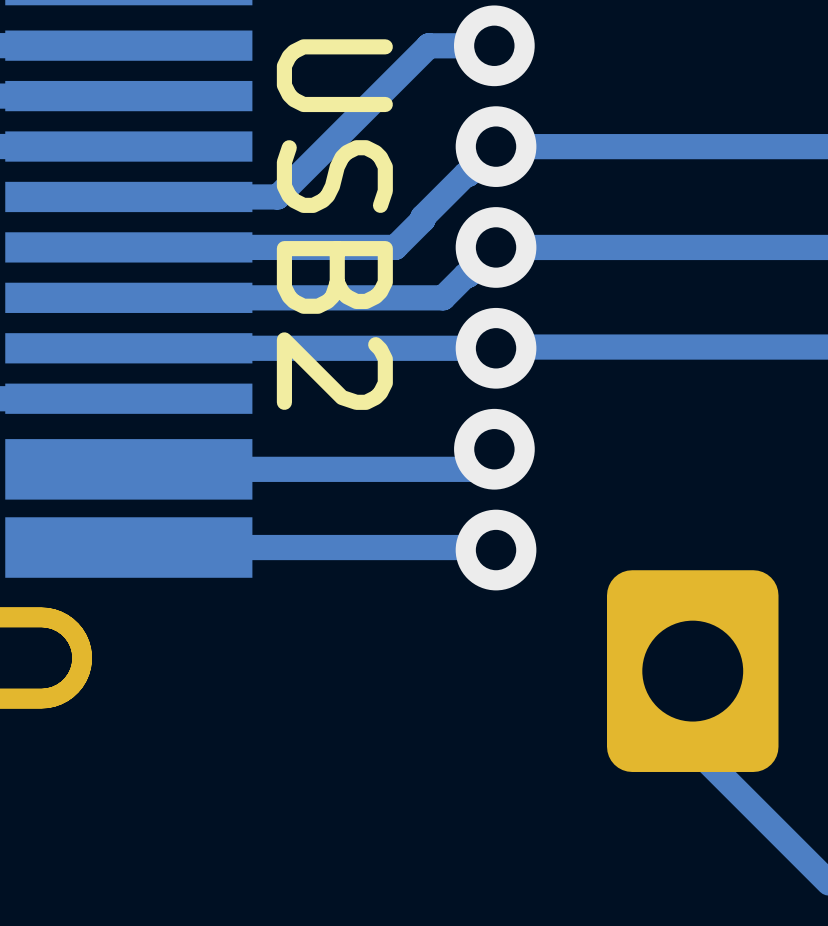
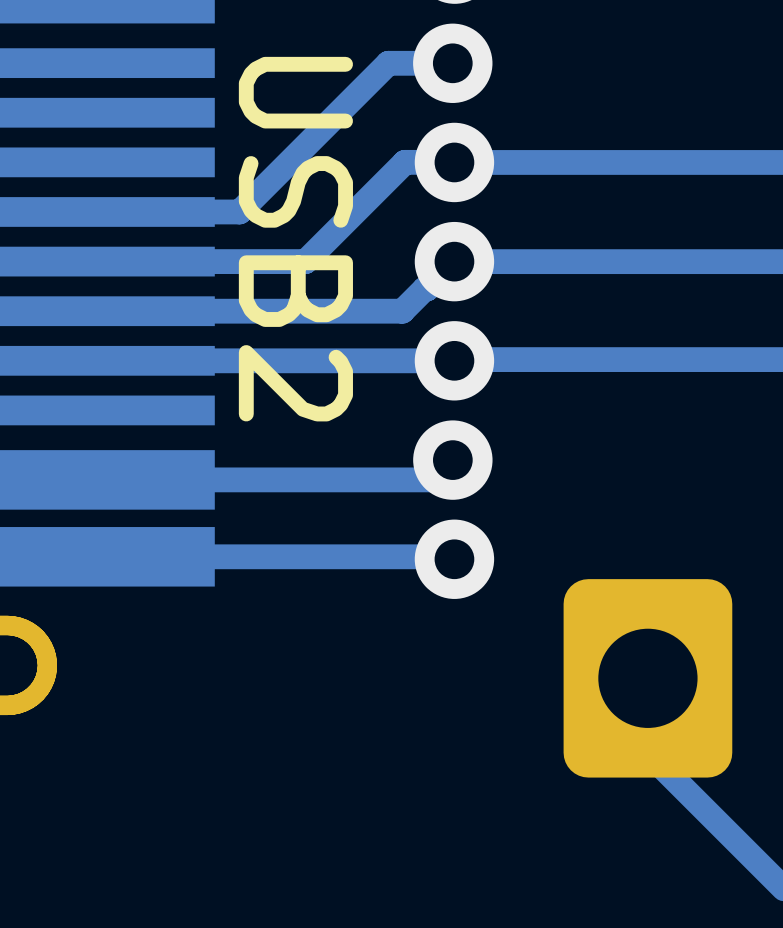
track: (496, 146) (468, 174) (465, 174) (395, 247) (344, 247) -> (454, 162) (404, 162) (305, 261)

